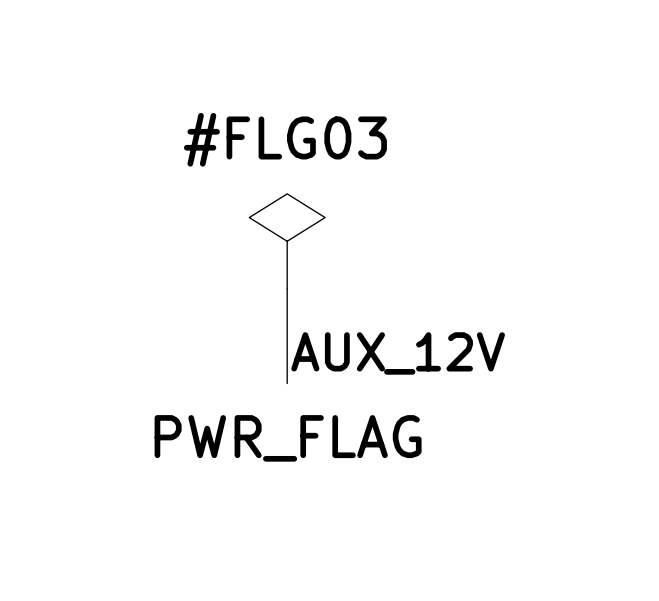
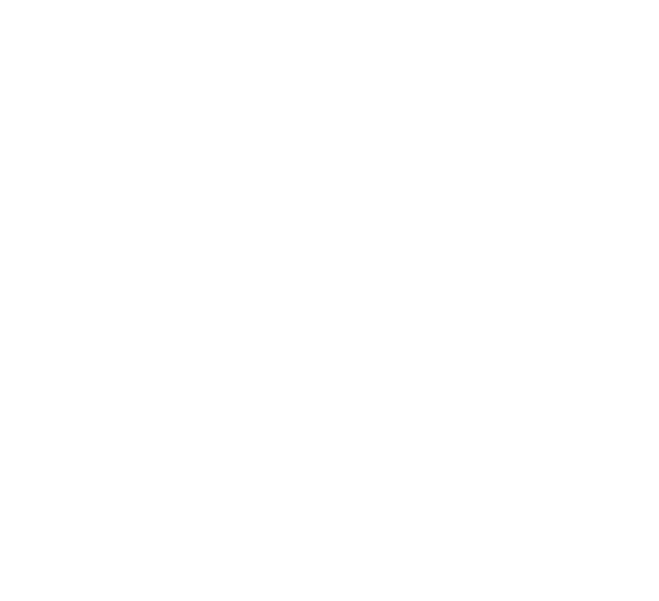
#FLG03: PWR_FLAG (287, 241) -> none
wire: (287, 288) (287, 383) -> none
label: AUX_12V (398, 353) -> none

